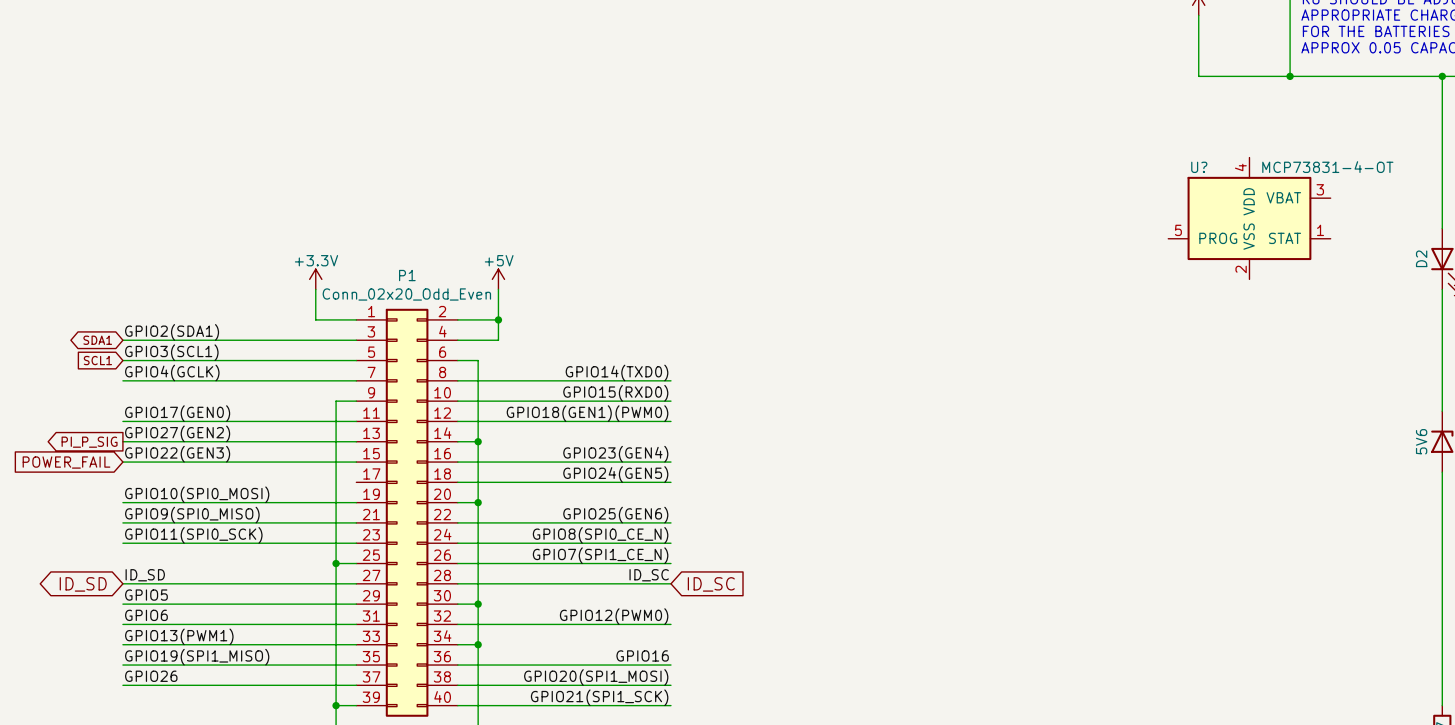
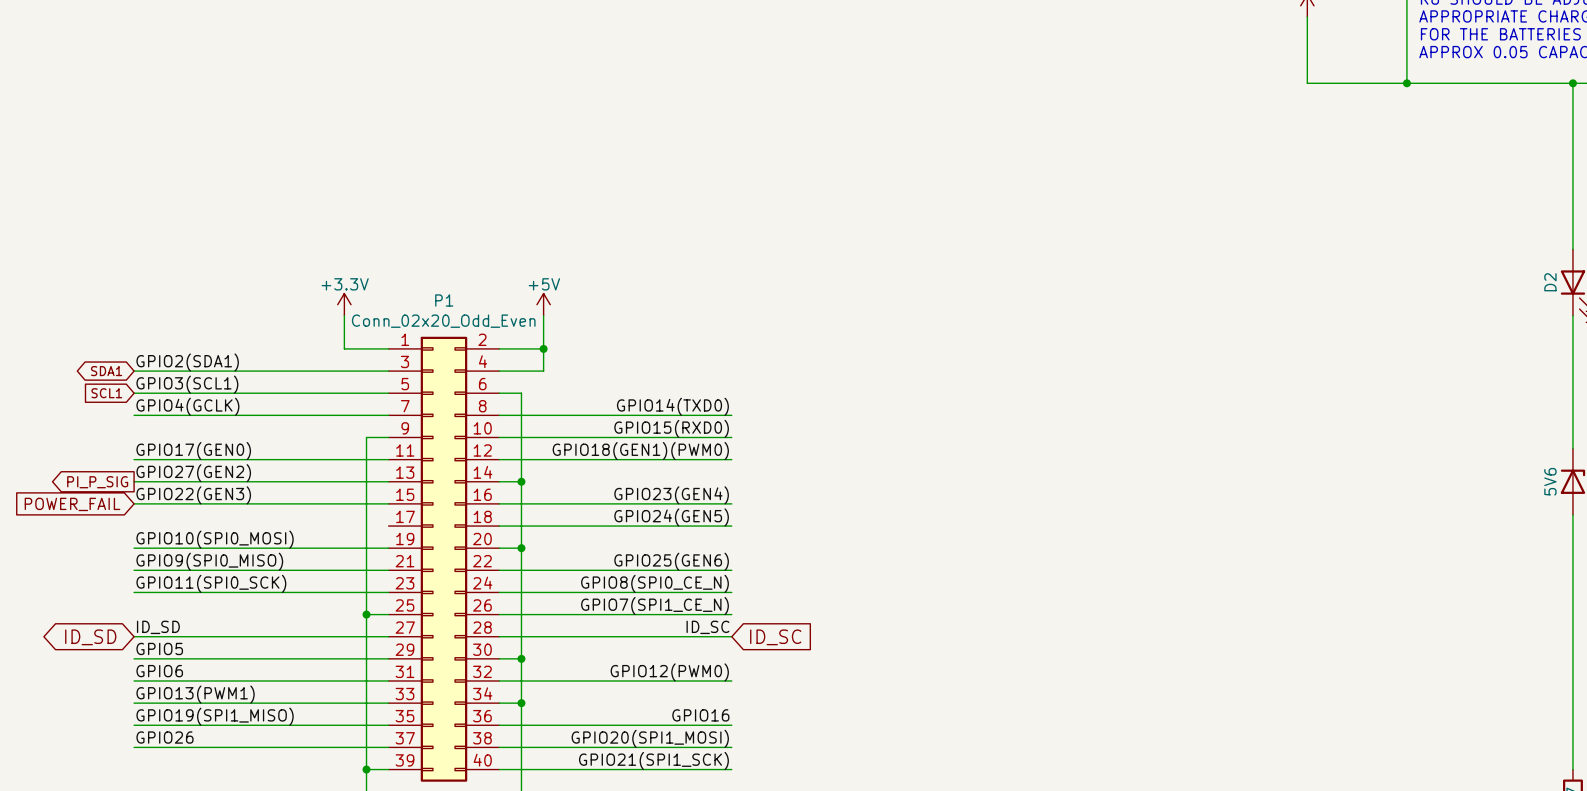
U?: MCP73831-4-OT (1249, 218) -> none

